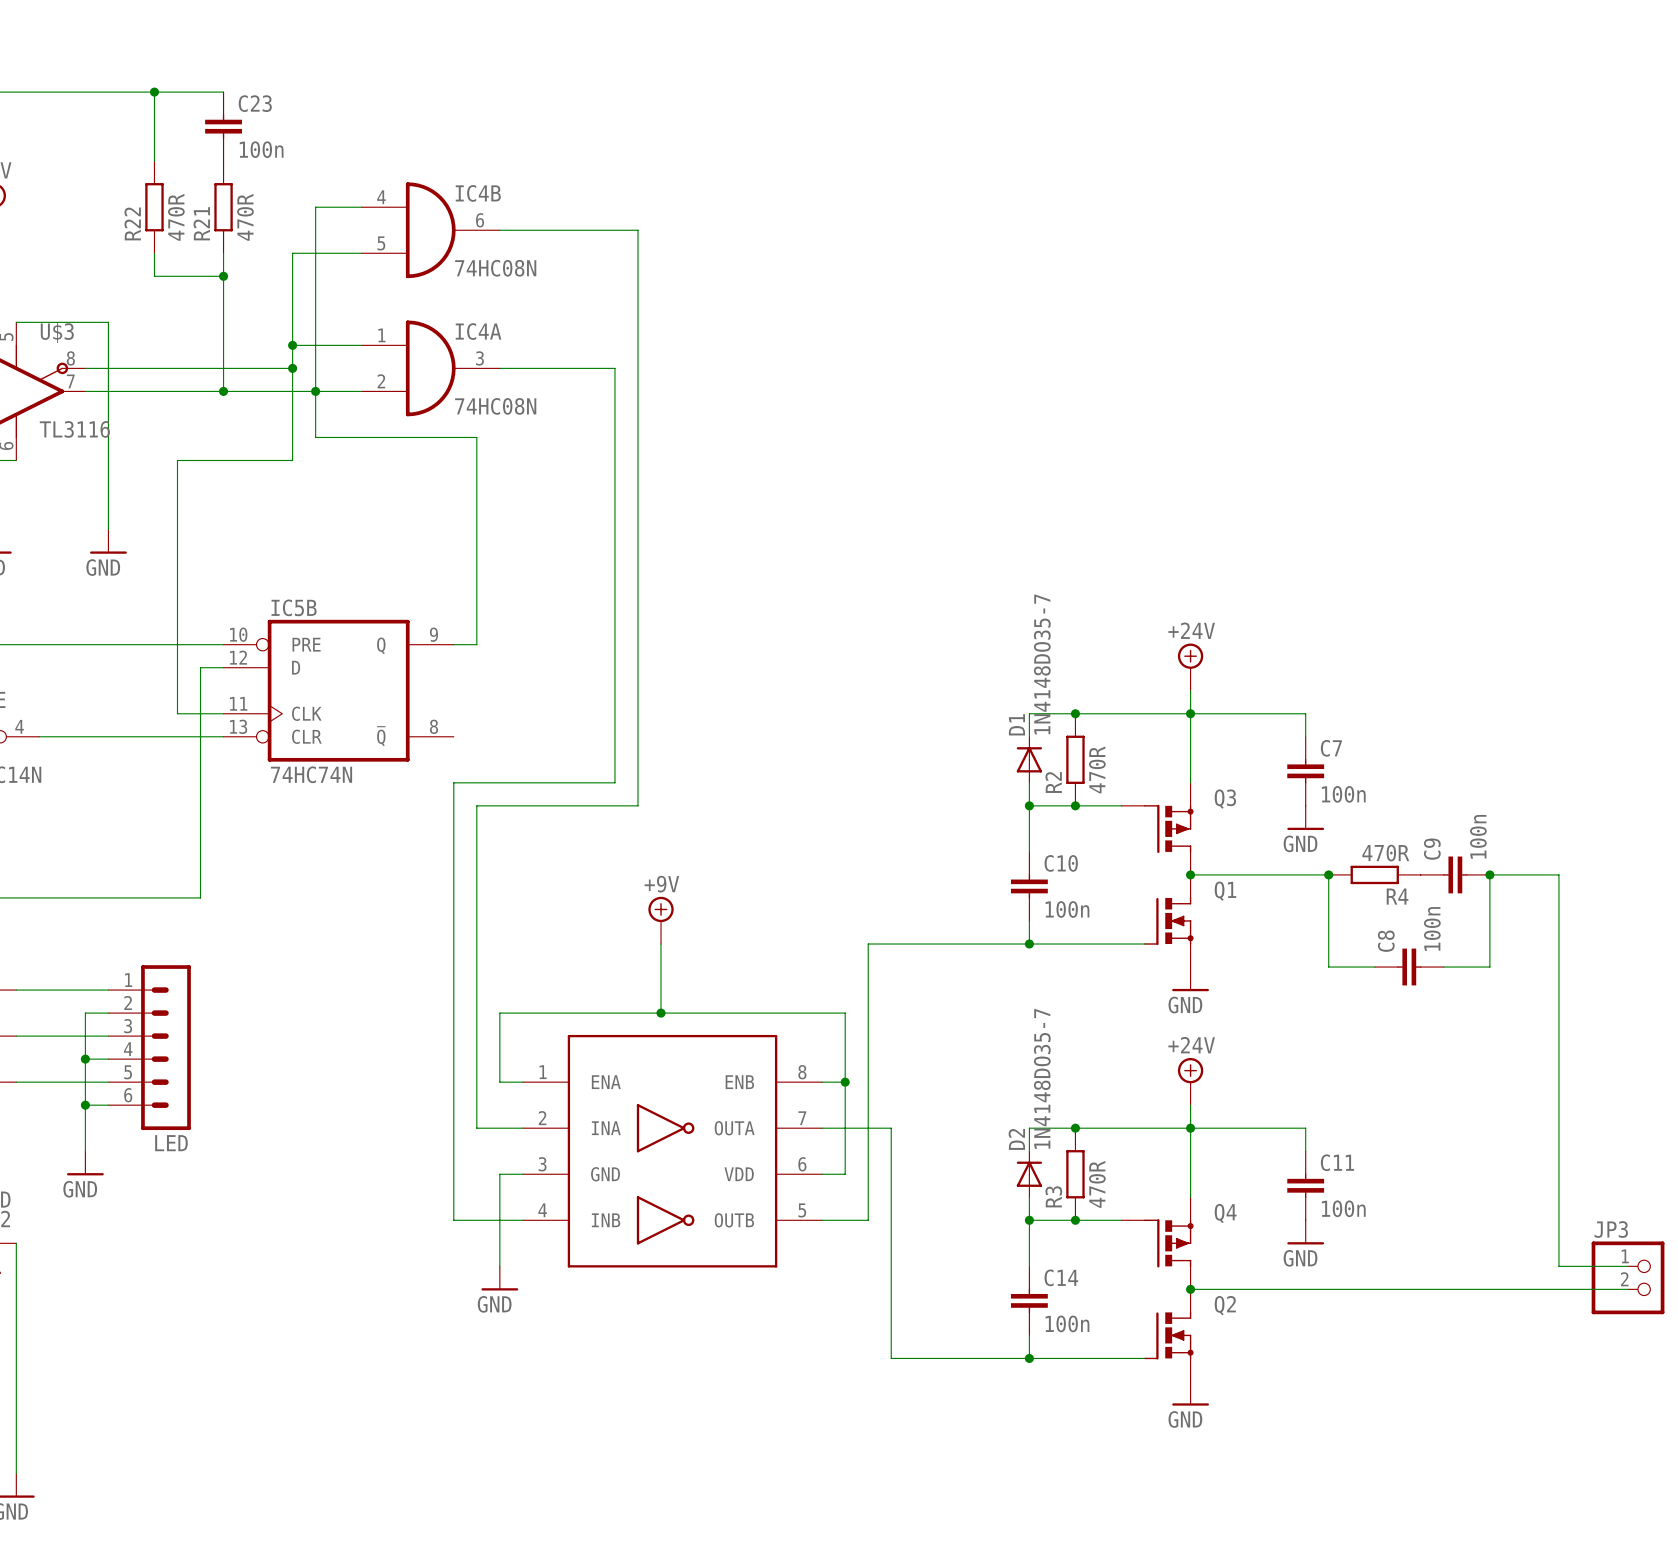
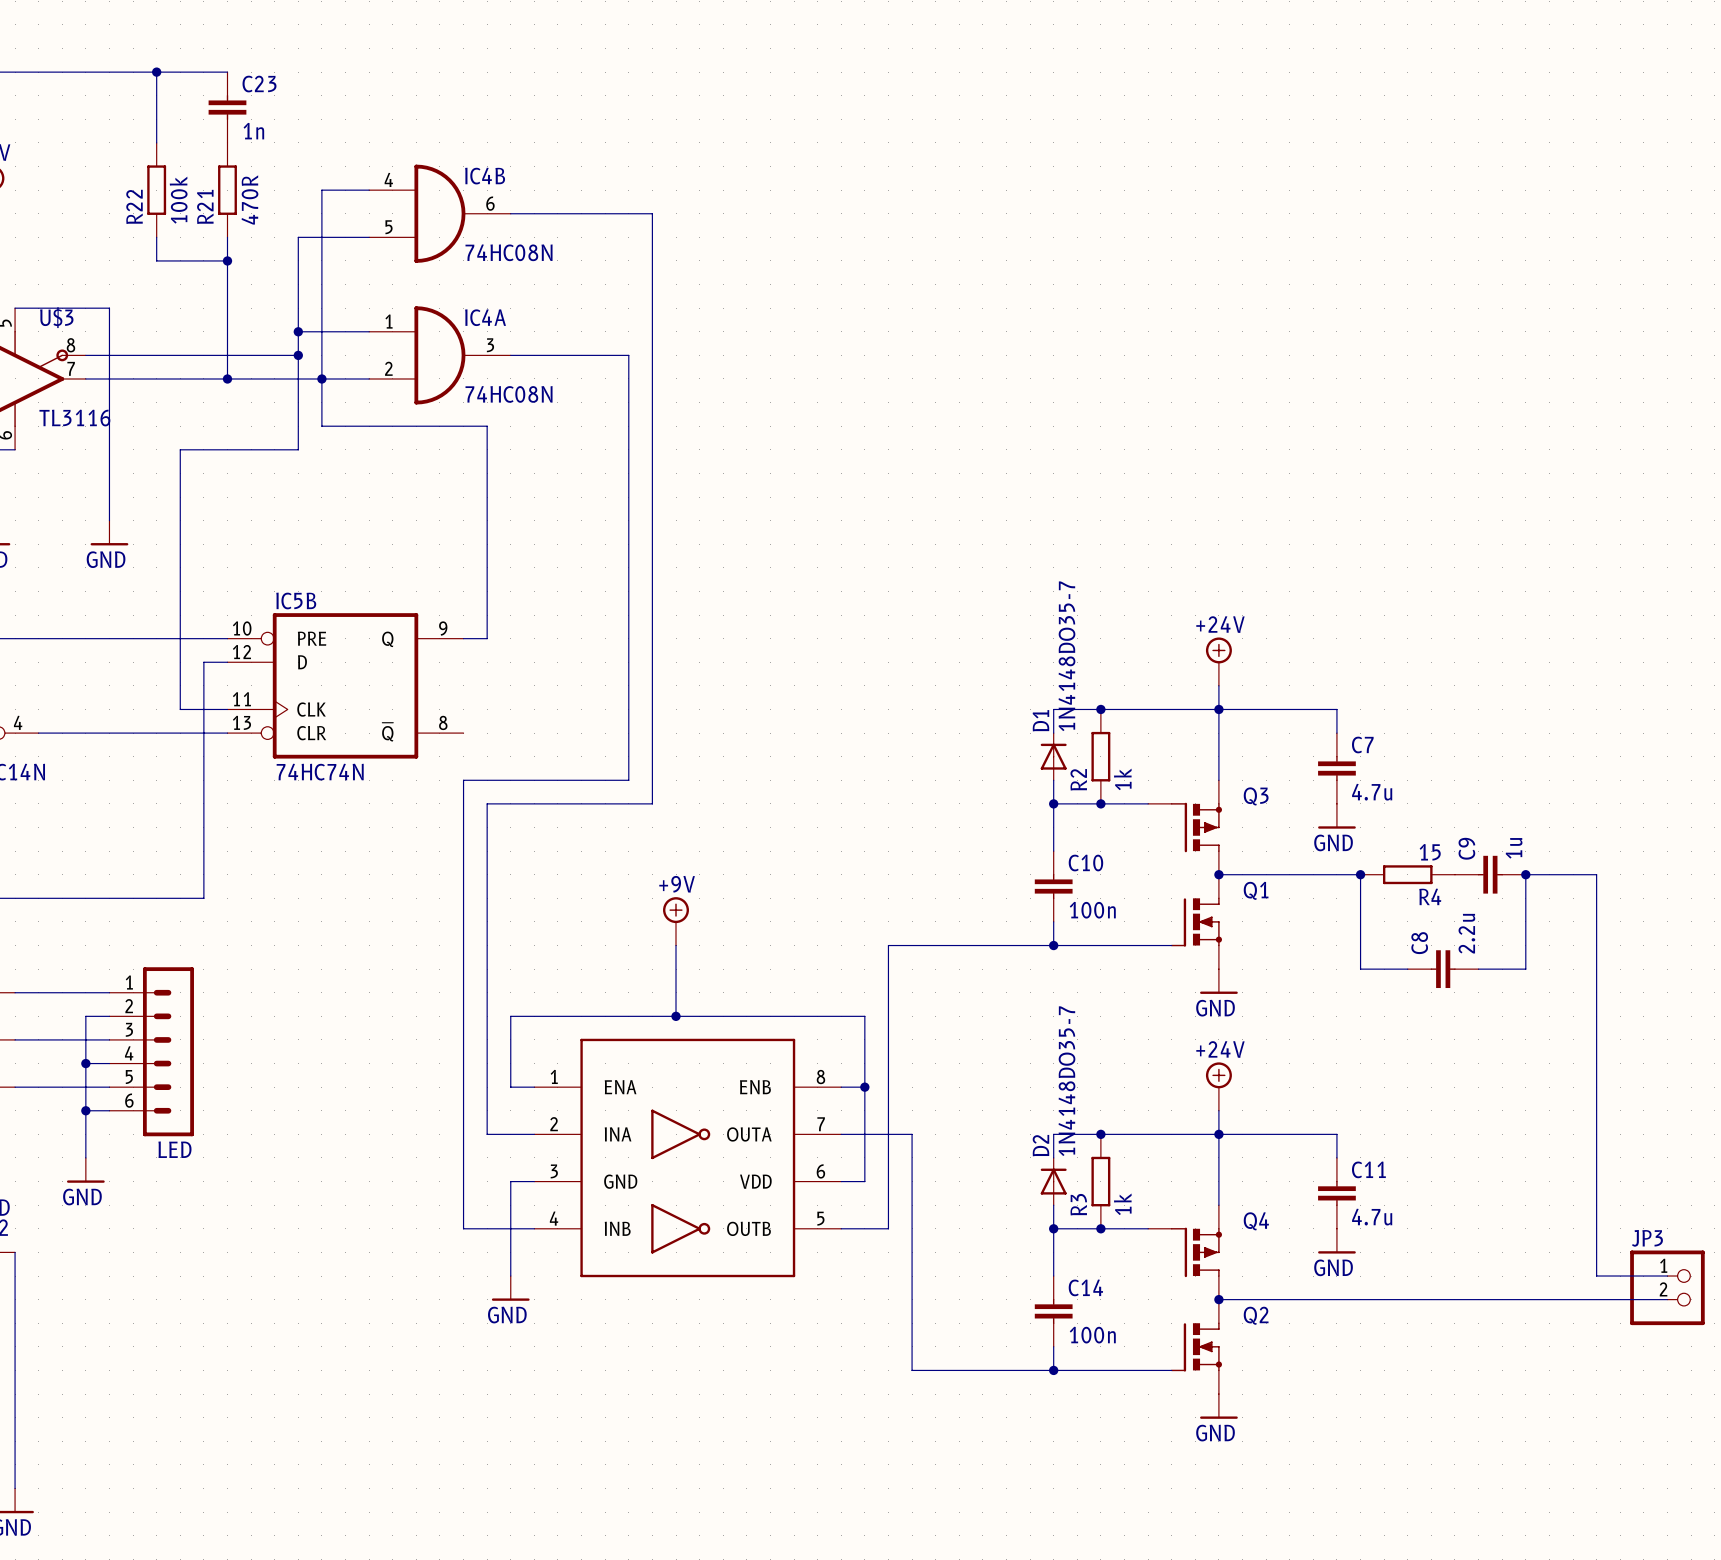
C23 value: 100n (261, 149) -> 1n (253, 131)
R22 value: 470R (176, 217) -> 100k (178, 200)
R2 value: 470R (1097, 769) -> 1k (1122, 779)
C7 value: 100n (1343, 794) -> 4.7u (1372, 792)
C9 value: 100n (1478, 836) -> 1u (1514, 848)
R4 value: 470R (1385, 853) -> 15 (1430, 852)
C8 value: 100n (1432, 928) -> 2.2u (1466, 933)
R3 value: 470R (1097, 1184) -> 1k (1122, 1204)
C11 value: 100n (1343, 1208) -> 4.7u (1372, 1217)

